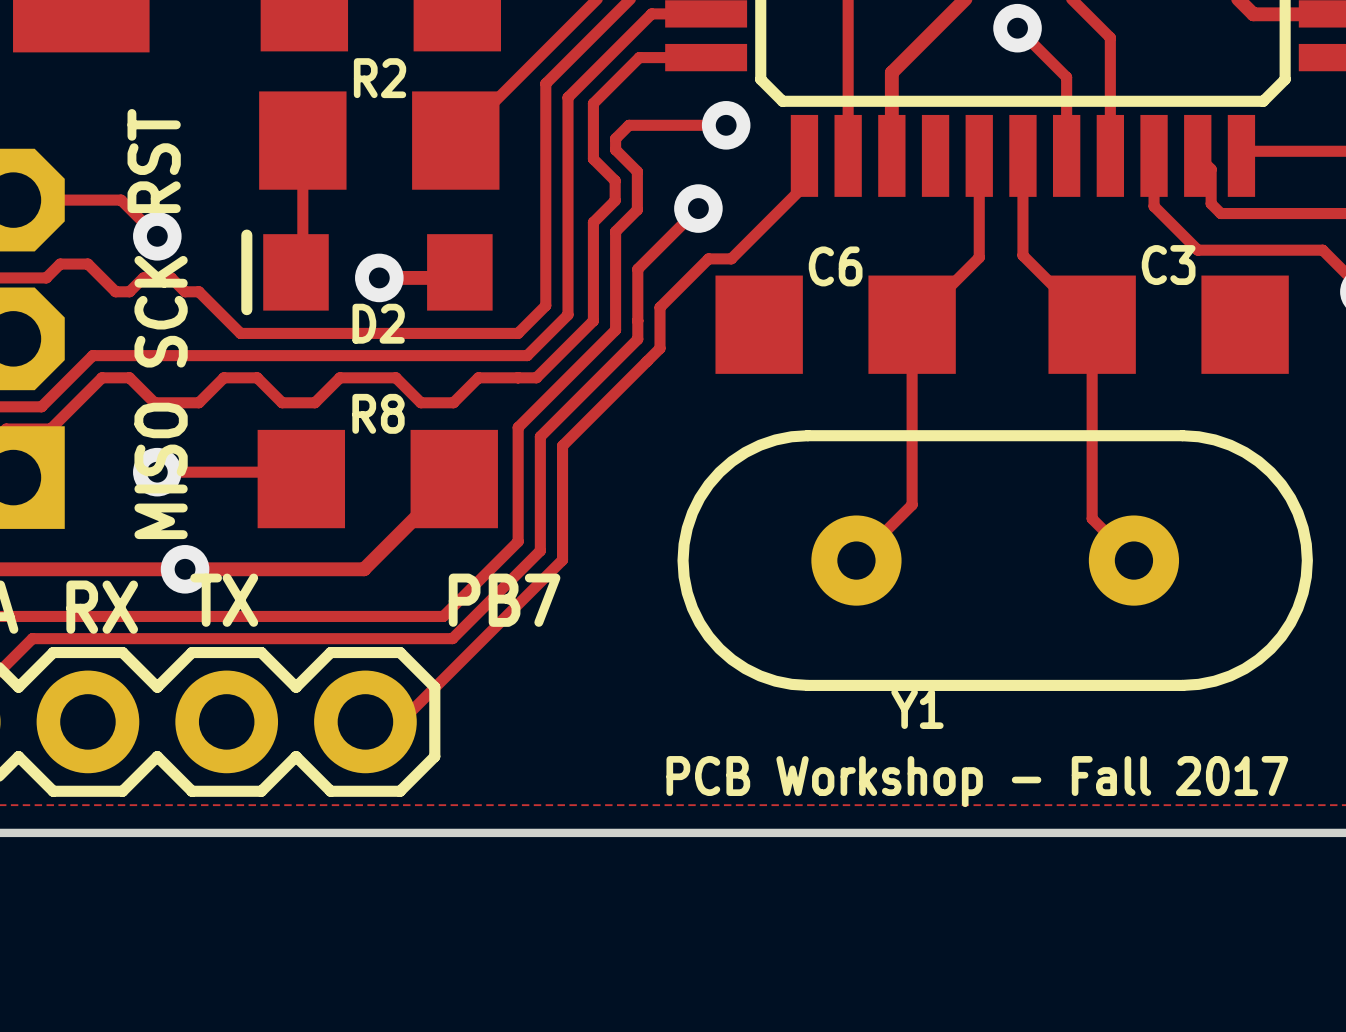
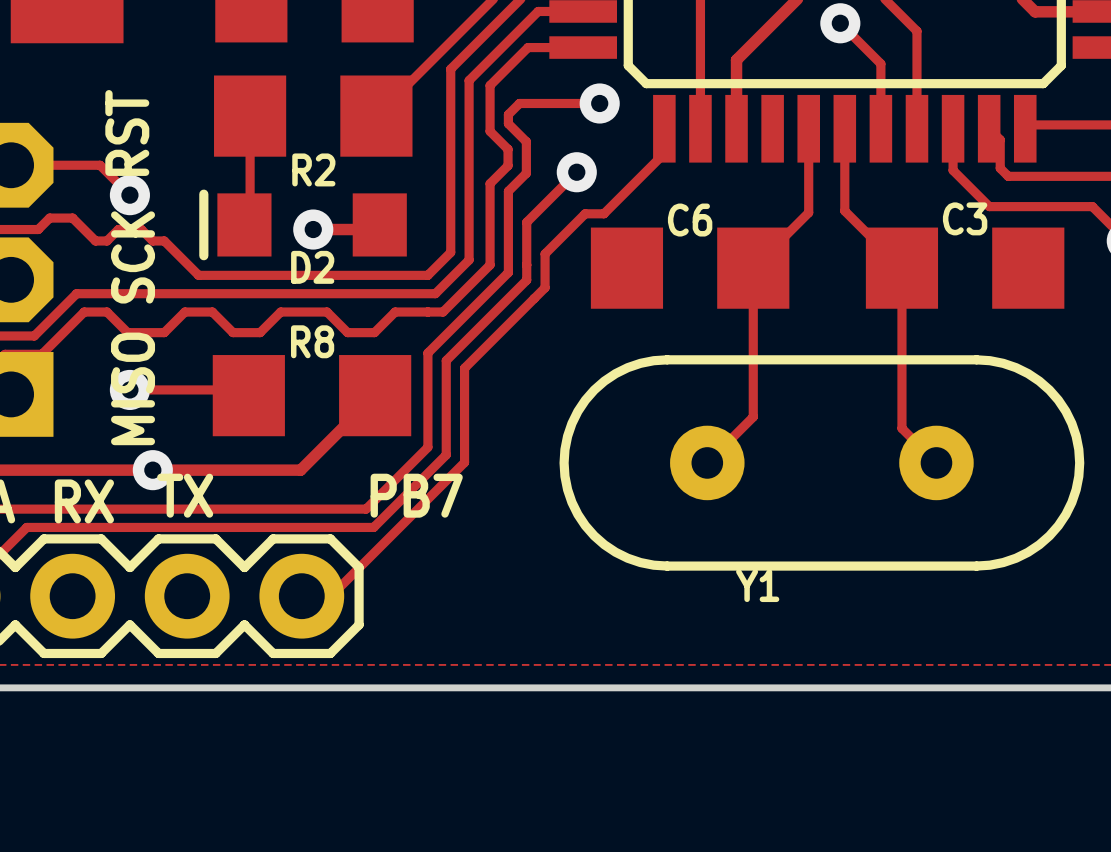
R2 name position: R2 (380, 78) -> R2 (313, 169)
text: PCB Workshop - Fall 2017 (977, 781) -> none

